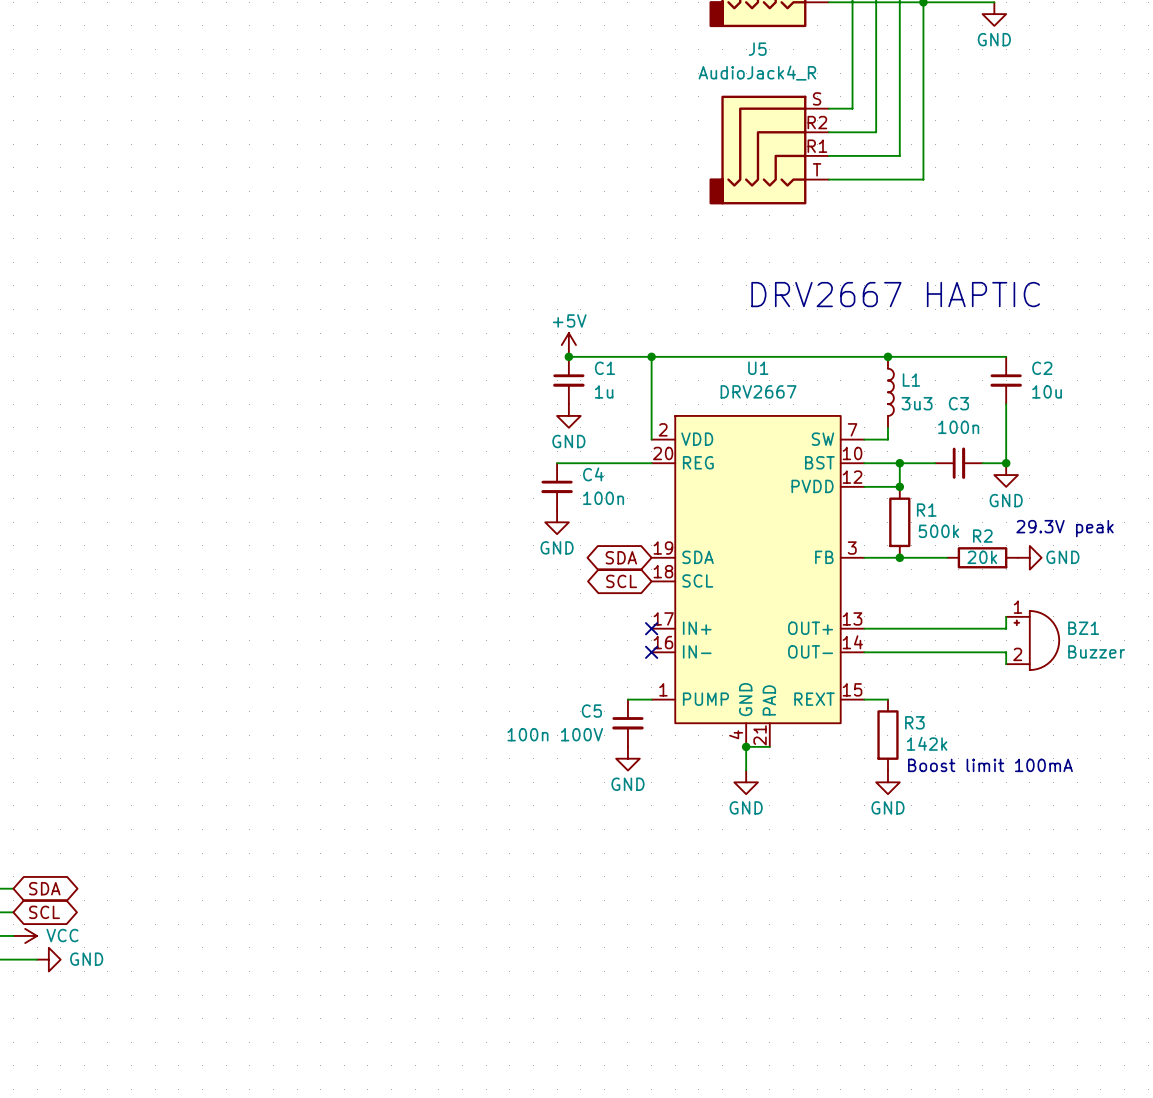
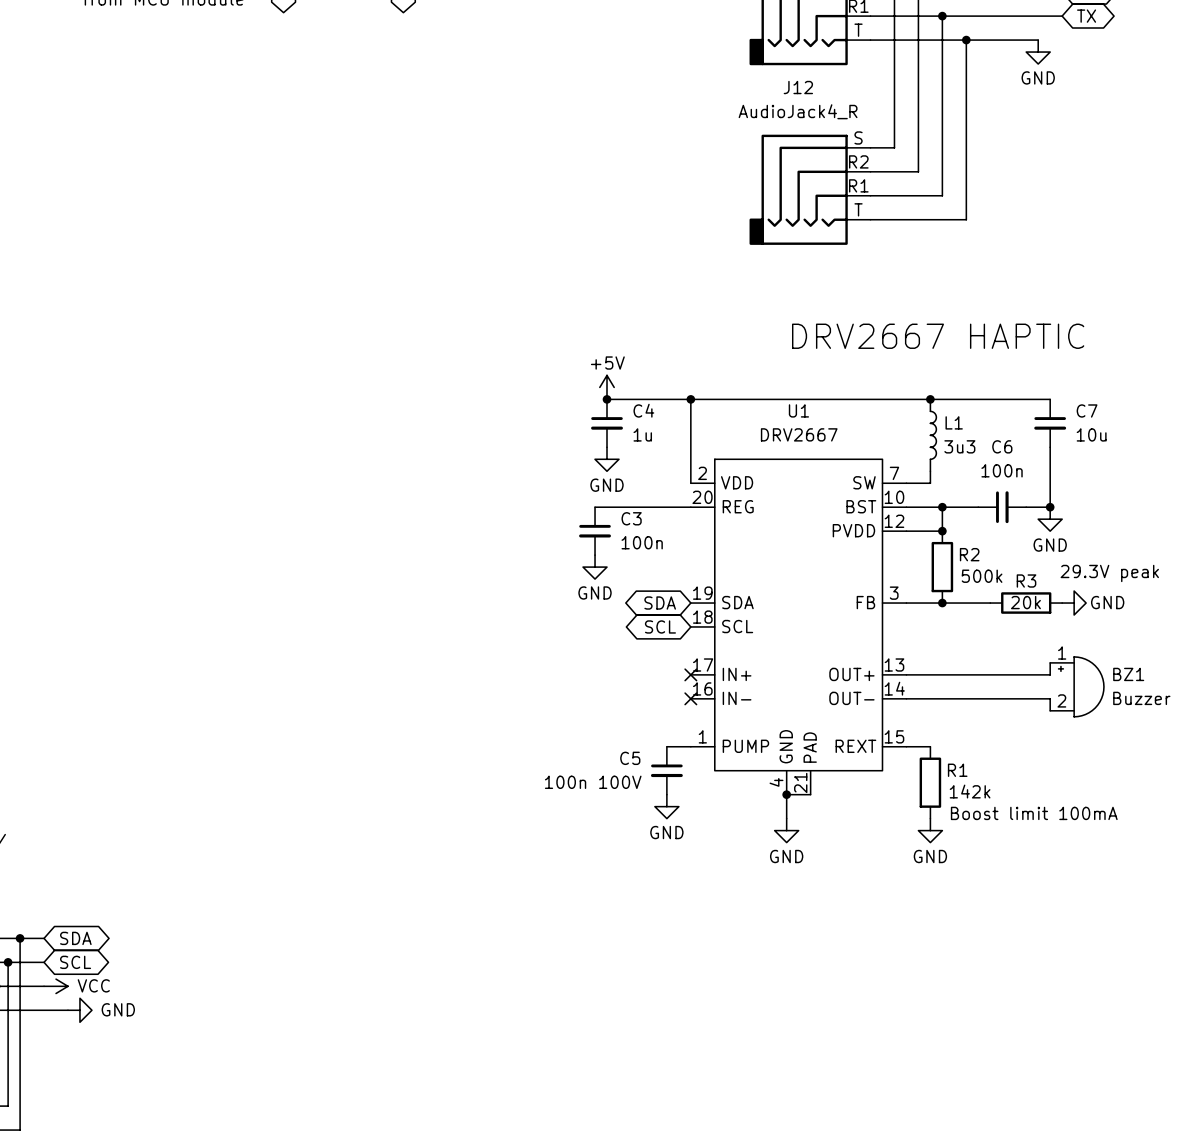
J5 name: J5 (757, 49) -> J12 (798, 87)
C1 name: C1 (604, 368) -> C4 (643, 410)
C2 name: C2 (1042, 368) -> C7 (1087, 410)
C3 name: C3 (958, 403) -> C6 (1002, 446)
C4 name: C4 (593, 474) -> C3 (631, 518)
R1 name: R1 (926, 510) -> R2 (969, 554)
R2 name: R2 (982, 536) -> R3 (1026, 581)
R3 name: R3 (914, 722) -> R1 (957, 770)

